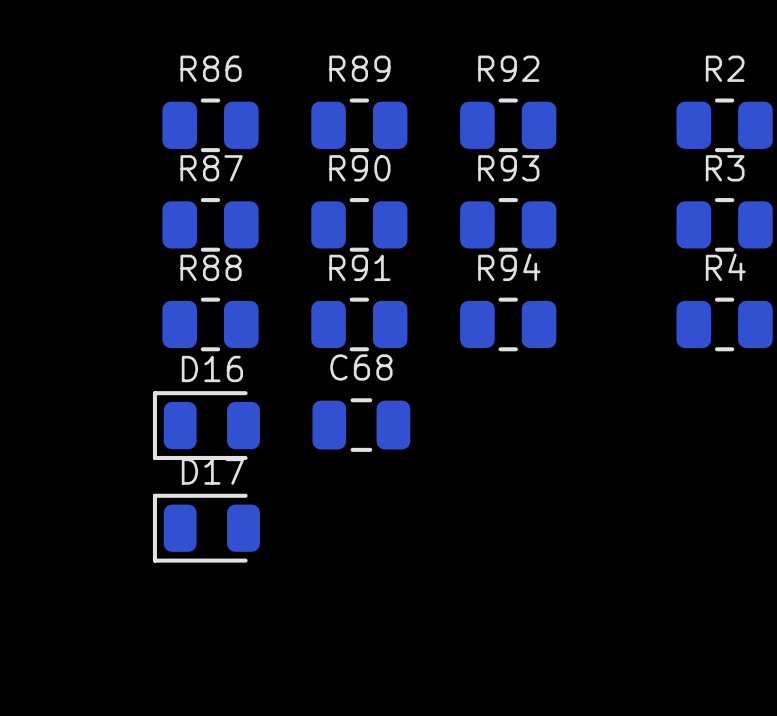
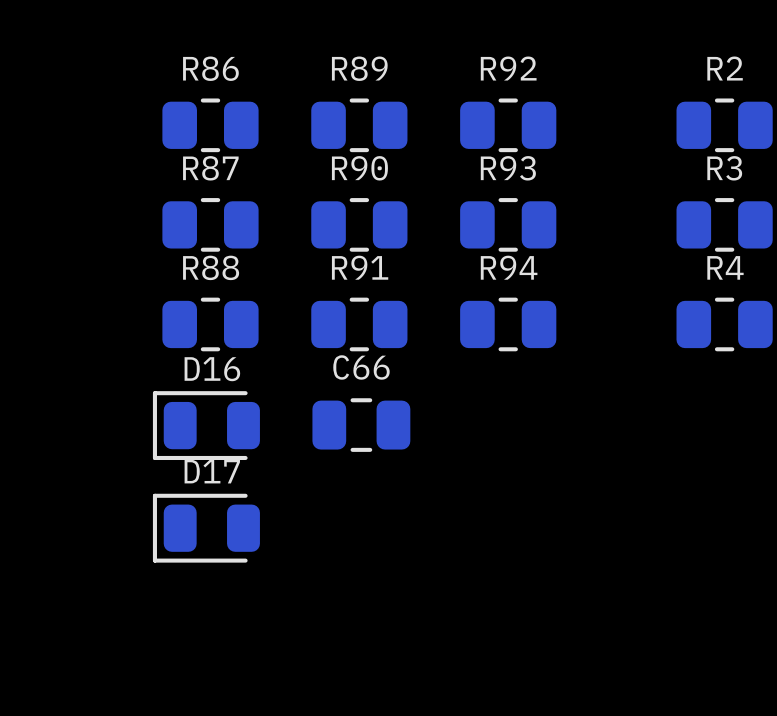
C68 name: C68 (361, 367) -> C66 (361, 367)

